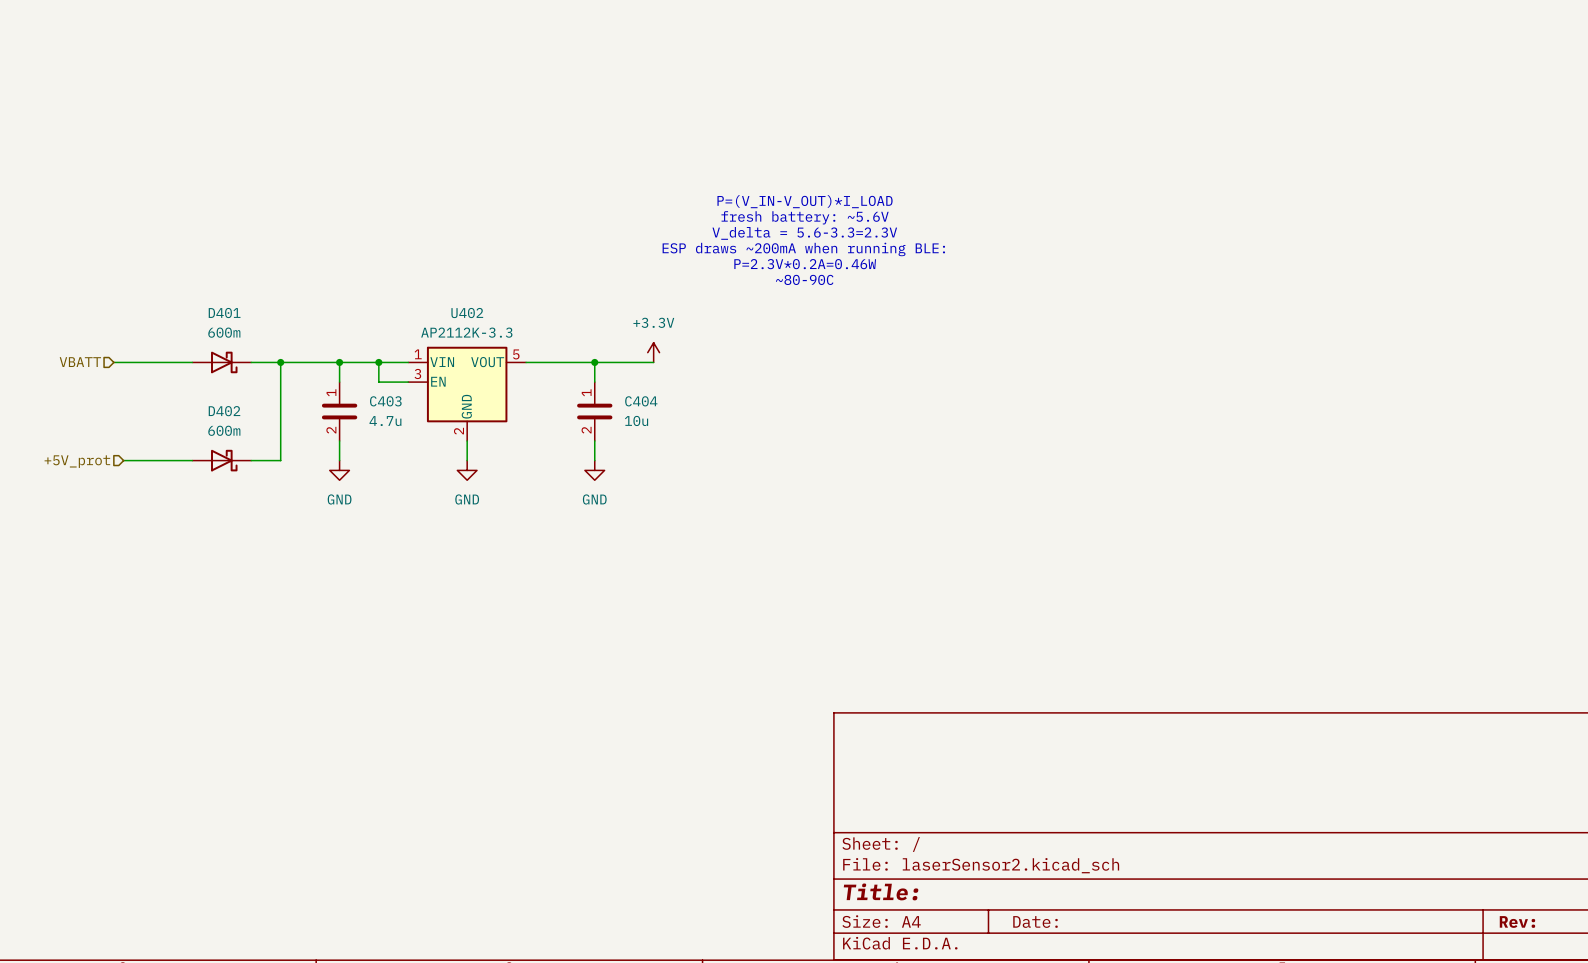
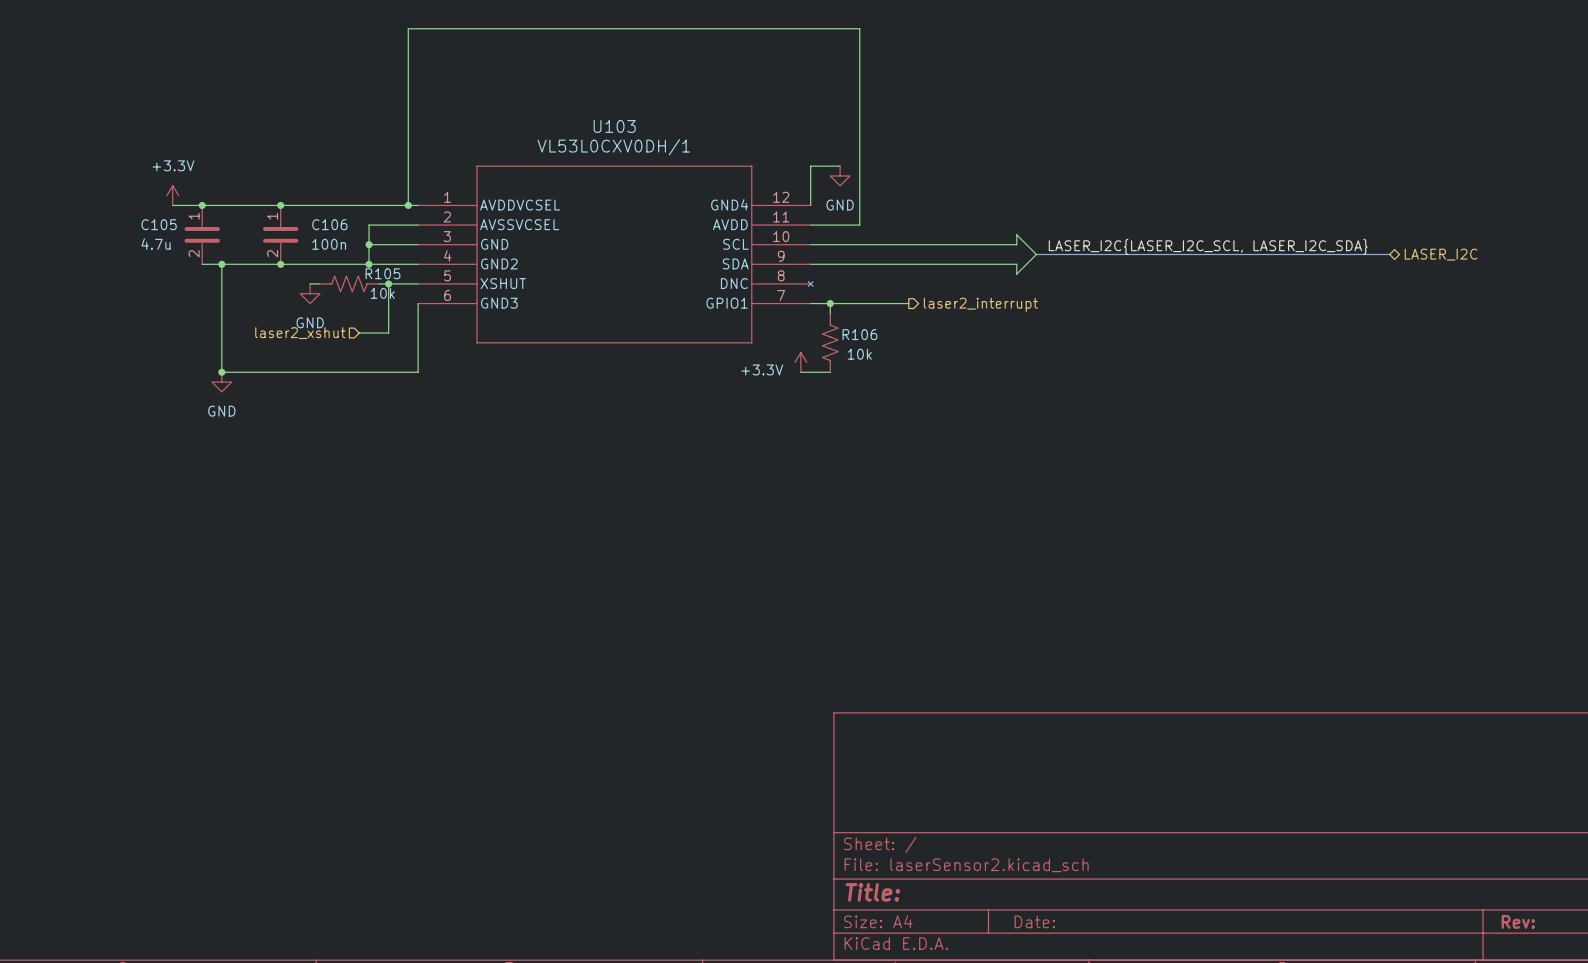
wire: none -> (840, 166) (810, 166) (810, 205)
power symbol: none -> GND (840, 175)
power symbol: none -> +3.3V (172, 195)
text: P=(V_IN-V_OUT)*I_LOAD (805, 201) -> none
wire: none -> (172, 205) (418, 205)
junction: none -> (202, 205)
junction: none -> (280, 205)
wire: none -> (408, 205) (408, 28) (859, 28) (859, 225) (810, 225)
junction: none -> (408, 205)
text: fresh battery: ~5.6V (805, 217) -> none
wire: none -> (418, 225) (369, 225) (369, 264)
text: V_delta = 5.6-3.3=2.3V (804, 233) -> none
C105: none -> 4.7u (202, 234)
C106: none -> 100n (280, 234)
wire: none -> (369, 244) (418, 244)
junction: none -> (369, 244)
wire: none -> (810, 244) (1016, 244) (1016, 234) (1036, 254) (1016, 274) (1016, 264) (810, 264)
label: none -> LASER_I2C{LASER_I2C_SCL, LASER_I2C_SDA} (1208, 246)
text: ESP draws ~200mA when running BLE: (803, 249) -> none
U103: none -> VL53L0CXV0DH/1 (615, 254)
bus: none -> (1036, 254) (1389, 254)
hierarchical label: none -> LASER_I2C (1441, 254)
wire: none -> (202, 264) (418, 264)
wire: none -> (221, 264) (221, 372) (418, 372) (418, 303)
junction: none -> (221, 264)
junction: none -> (280, 264)
junction: none -> (369, 264)
text: P=2.3V*0.2A=0.46W (805, 264) -> none
text: ~80-90C (804, 279) -> none
wire: none -> (310, 283) (319, 283)
R105: none -> 10k (349, 283)
wire: none -> (378, 283) (418, 283)
wire: none -> (388, 283) (388, 333) (359, 333)
junction: none -> (388, 283)
power symbol: none -> GND (310, 293)
wire: none -> (810, 303) (908, 303)
wire: none -> (830, 303) (830, 313)
junction: none -> (830, 303)
hierarchical label: none -> laser2_interrupt (980, 304)
power symbol text position: +3.3V (653, 322) -> +3.3V (762, 369)
hierarchical label: none -> laser2_xshut (300, 333)
R106: none -> 10k (830, 342)
power symbol position: +3.3V (653, 352) -> +3.3V (800, 362)
hierarchical label: VBATT (80, 362) -> none
wire: (113, 362) (192, 362) -> none
D401: 600m (221, 362) -> none
wire: (251, 362) (408, 362) -> none
wire: (280, 362) (280, 460) (251, 460) -> none
junction: (280, 362) -> none
wire: (339, 362) (339, 382) -> none
junction: (339, 362) -> none
wire: (378, 362) (378, 382) (408, 382) -> none
junction: (378, 362) -> none
wire: (526, 362) (653, 362) -> none
wire: (594, 362) (594, 382) -> none
junction: (594, 362) -> none
junction: none -> (221, 372)
wire: none -> (800, 372) (830, 372)
power symbol: none -> GND (221, 382)
U402: AP2112K-3.3 (467, 393) -> none
C403: 4.7u (339, 411) -> none
C404: 10u (594, 411) -> none
wire: (339, 440) (339, 460) -> none
wire: (467, 440) (467, 460) -> none
wire: (594, 440) (594, 460) -> none
wire: (123, 460) (192, 460) -> none
D402: 600m (221, 460) -> none
hierarchical label: +5V_prot (77, 461) -> none
power symbol: GND (339, 470) -> none
power symbol: GND (467, 470) -> none
power symbol: GND (594, 470) -> none

